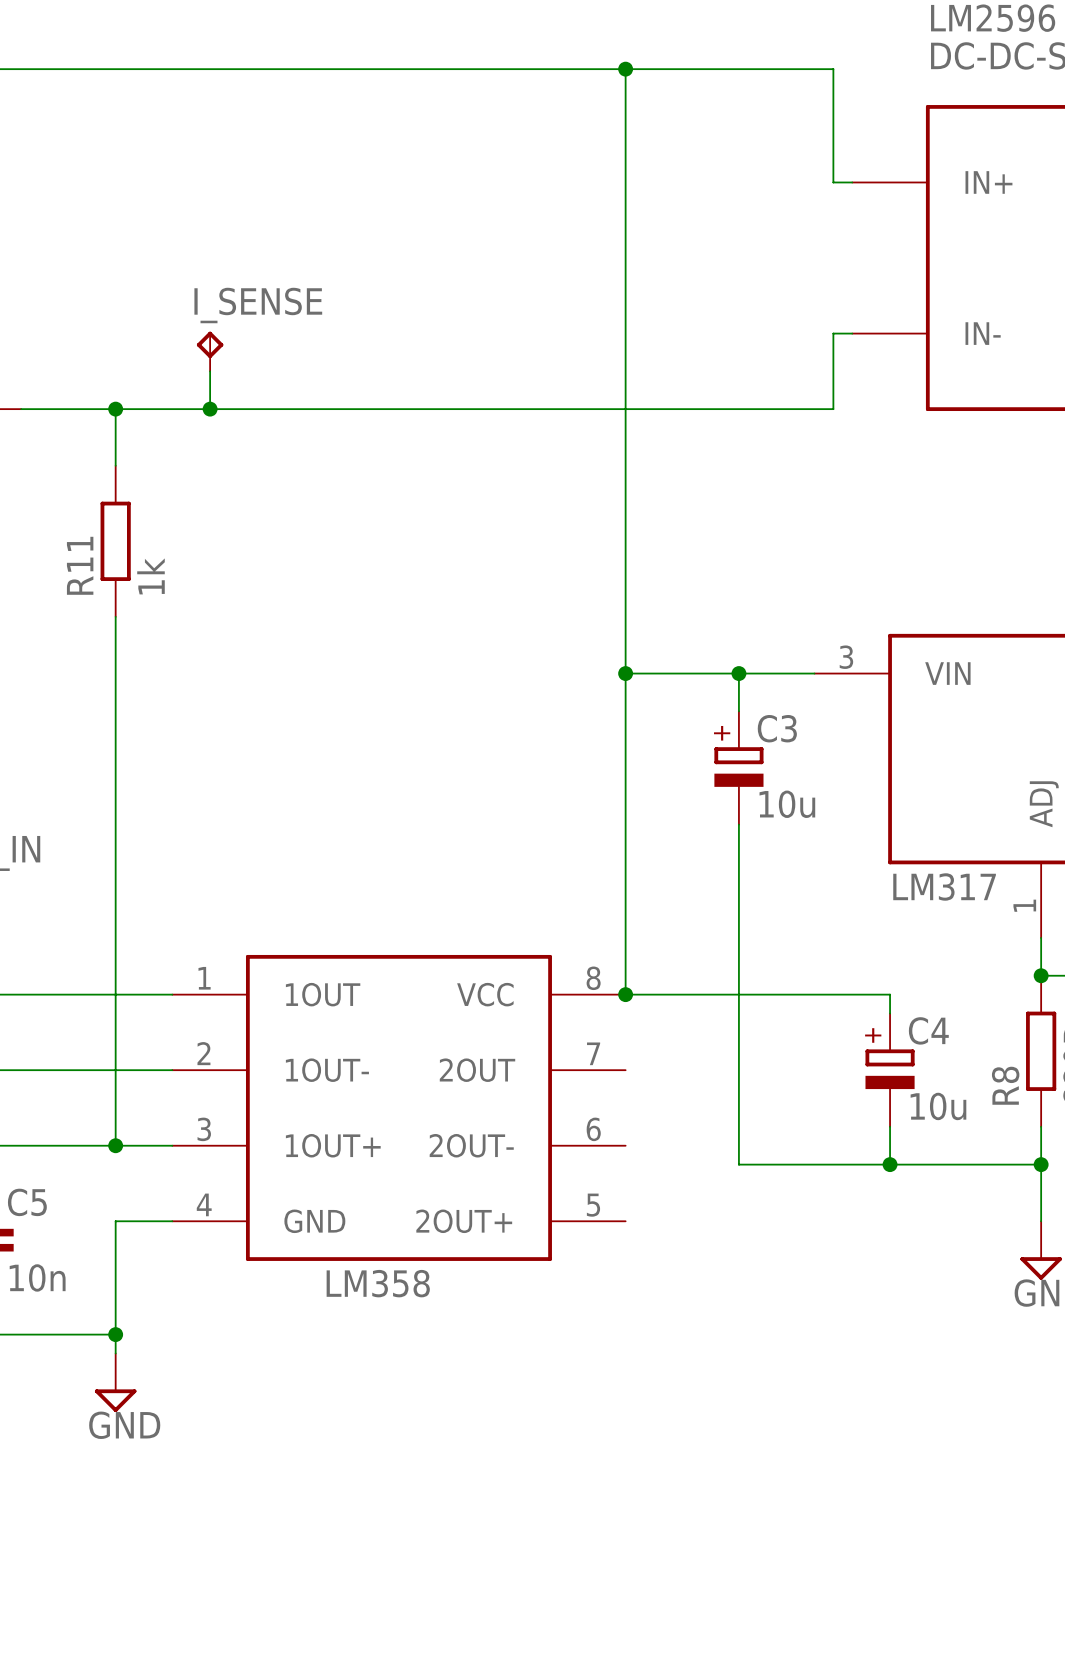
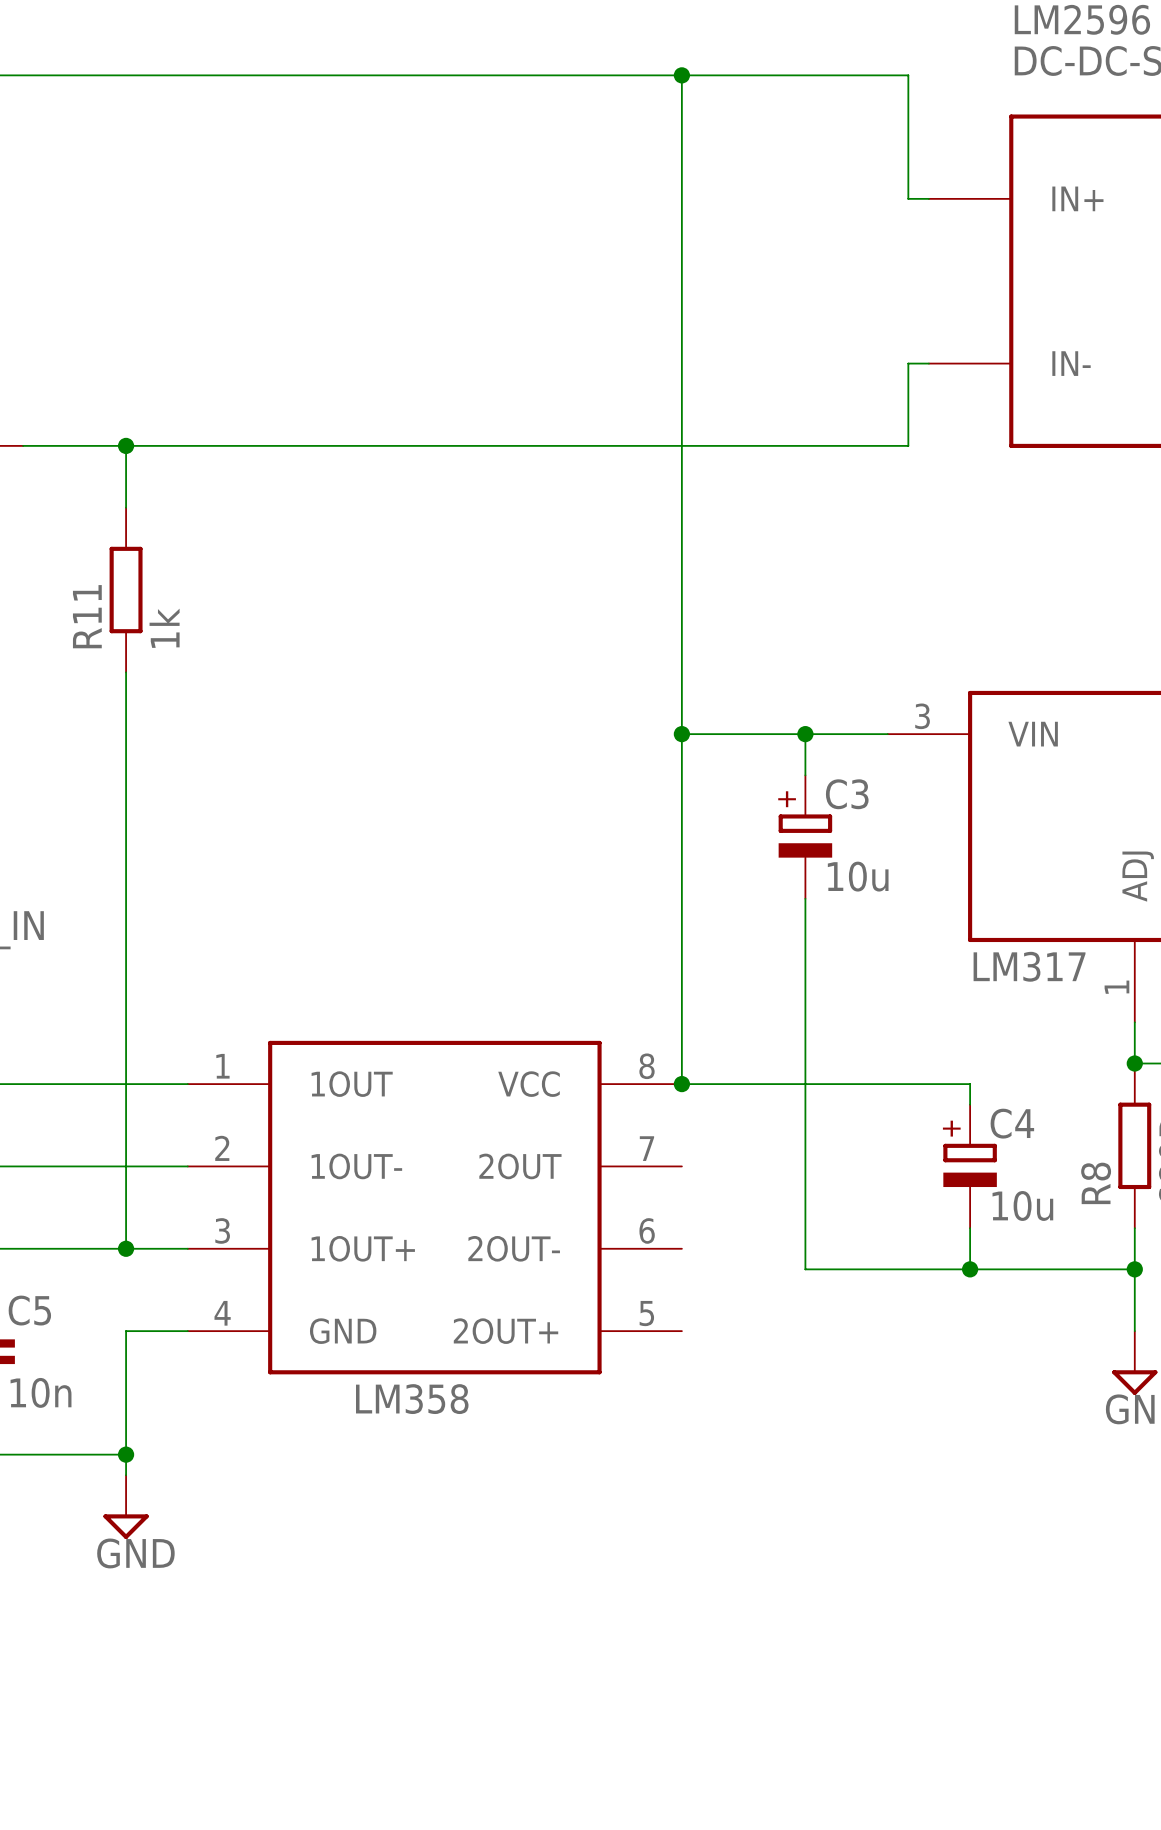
I_SENSE: (210, 351) -> none
wire: (210, 371) (210, 409) -> none
junction: (210, 409) -> none

